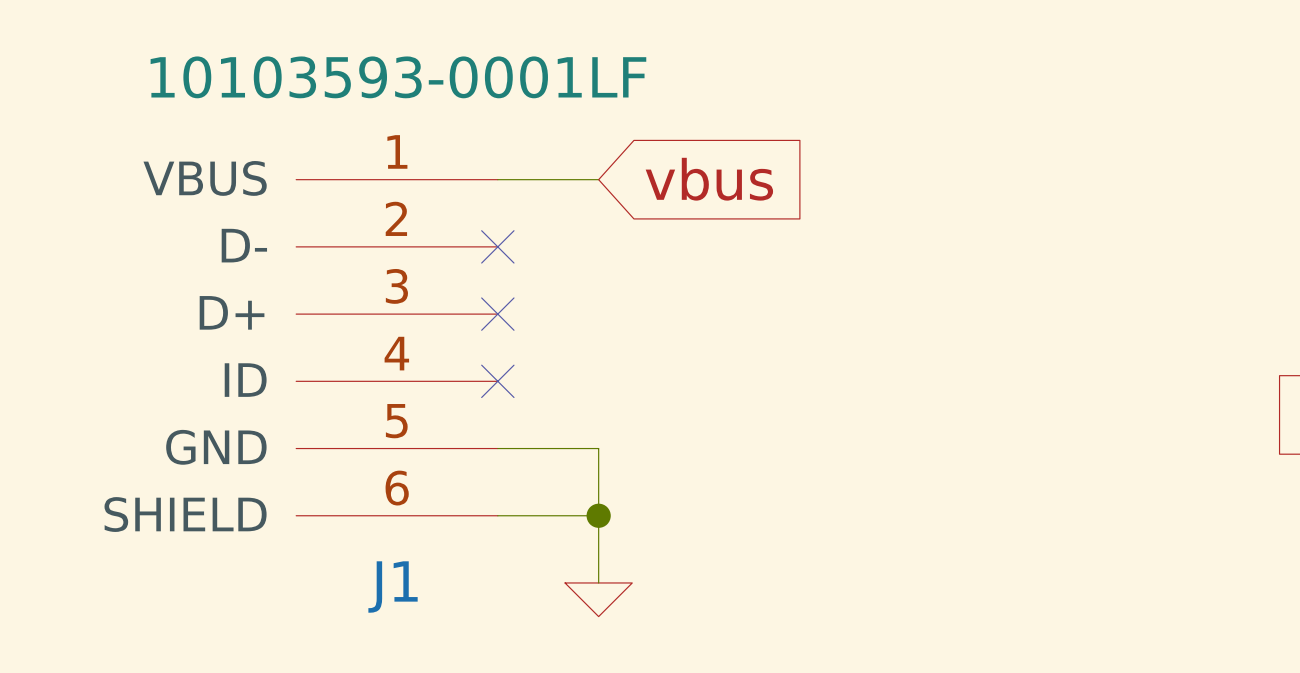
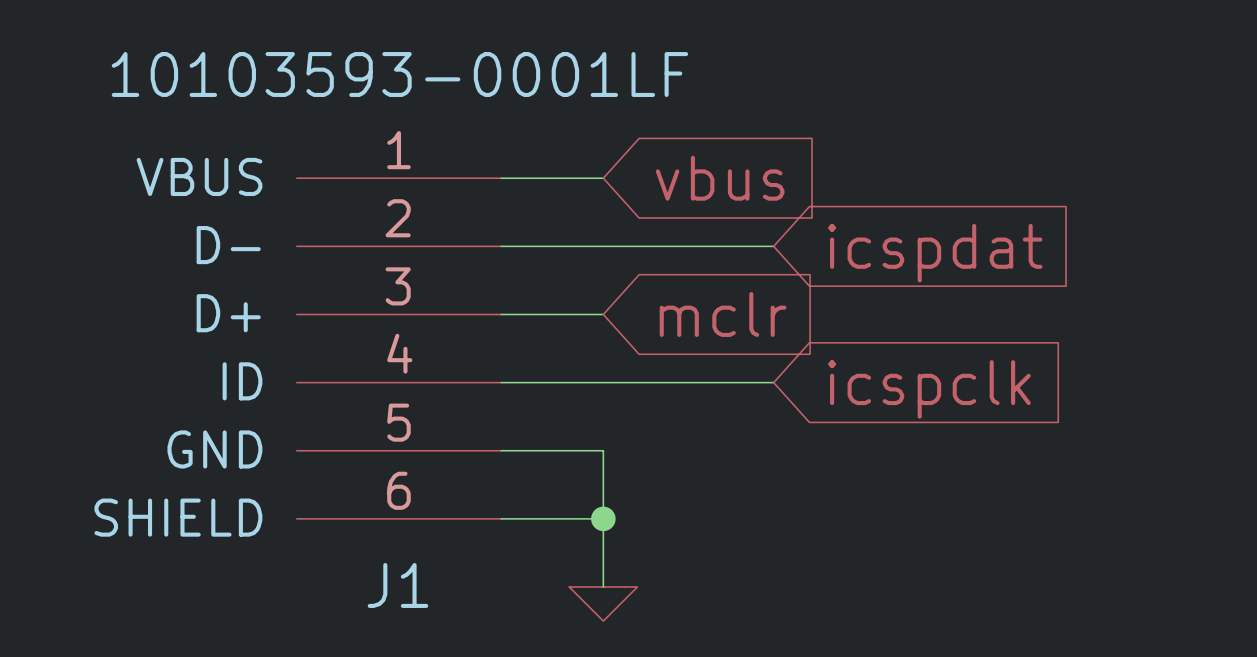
wire: none -> (501, 246) (773, 246)
no-connect mark: (497, 246) -> none
global label: none -> icspdat (935, 253)
global label: none -> mclr (723, 314)
wire: none -> (501, 314) (603, 314)
no-connect mark: (497, 314) -> none
wire: none -> (501, 382) (773, 382)
no-connect mark: (497, 381) -> none
global label: none -> icspclk (929, 389)

